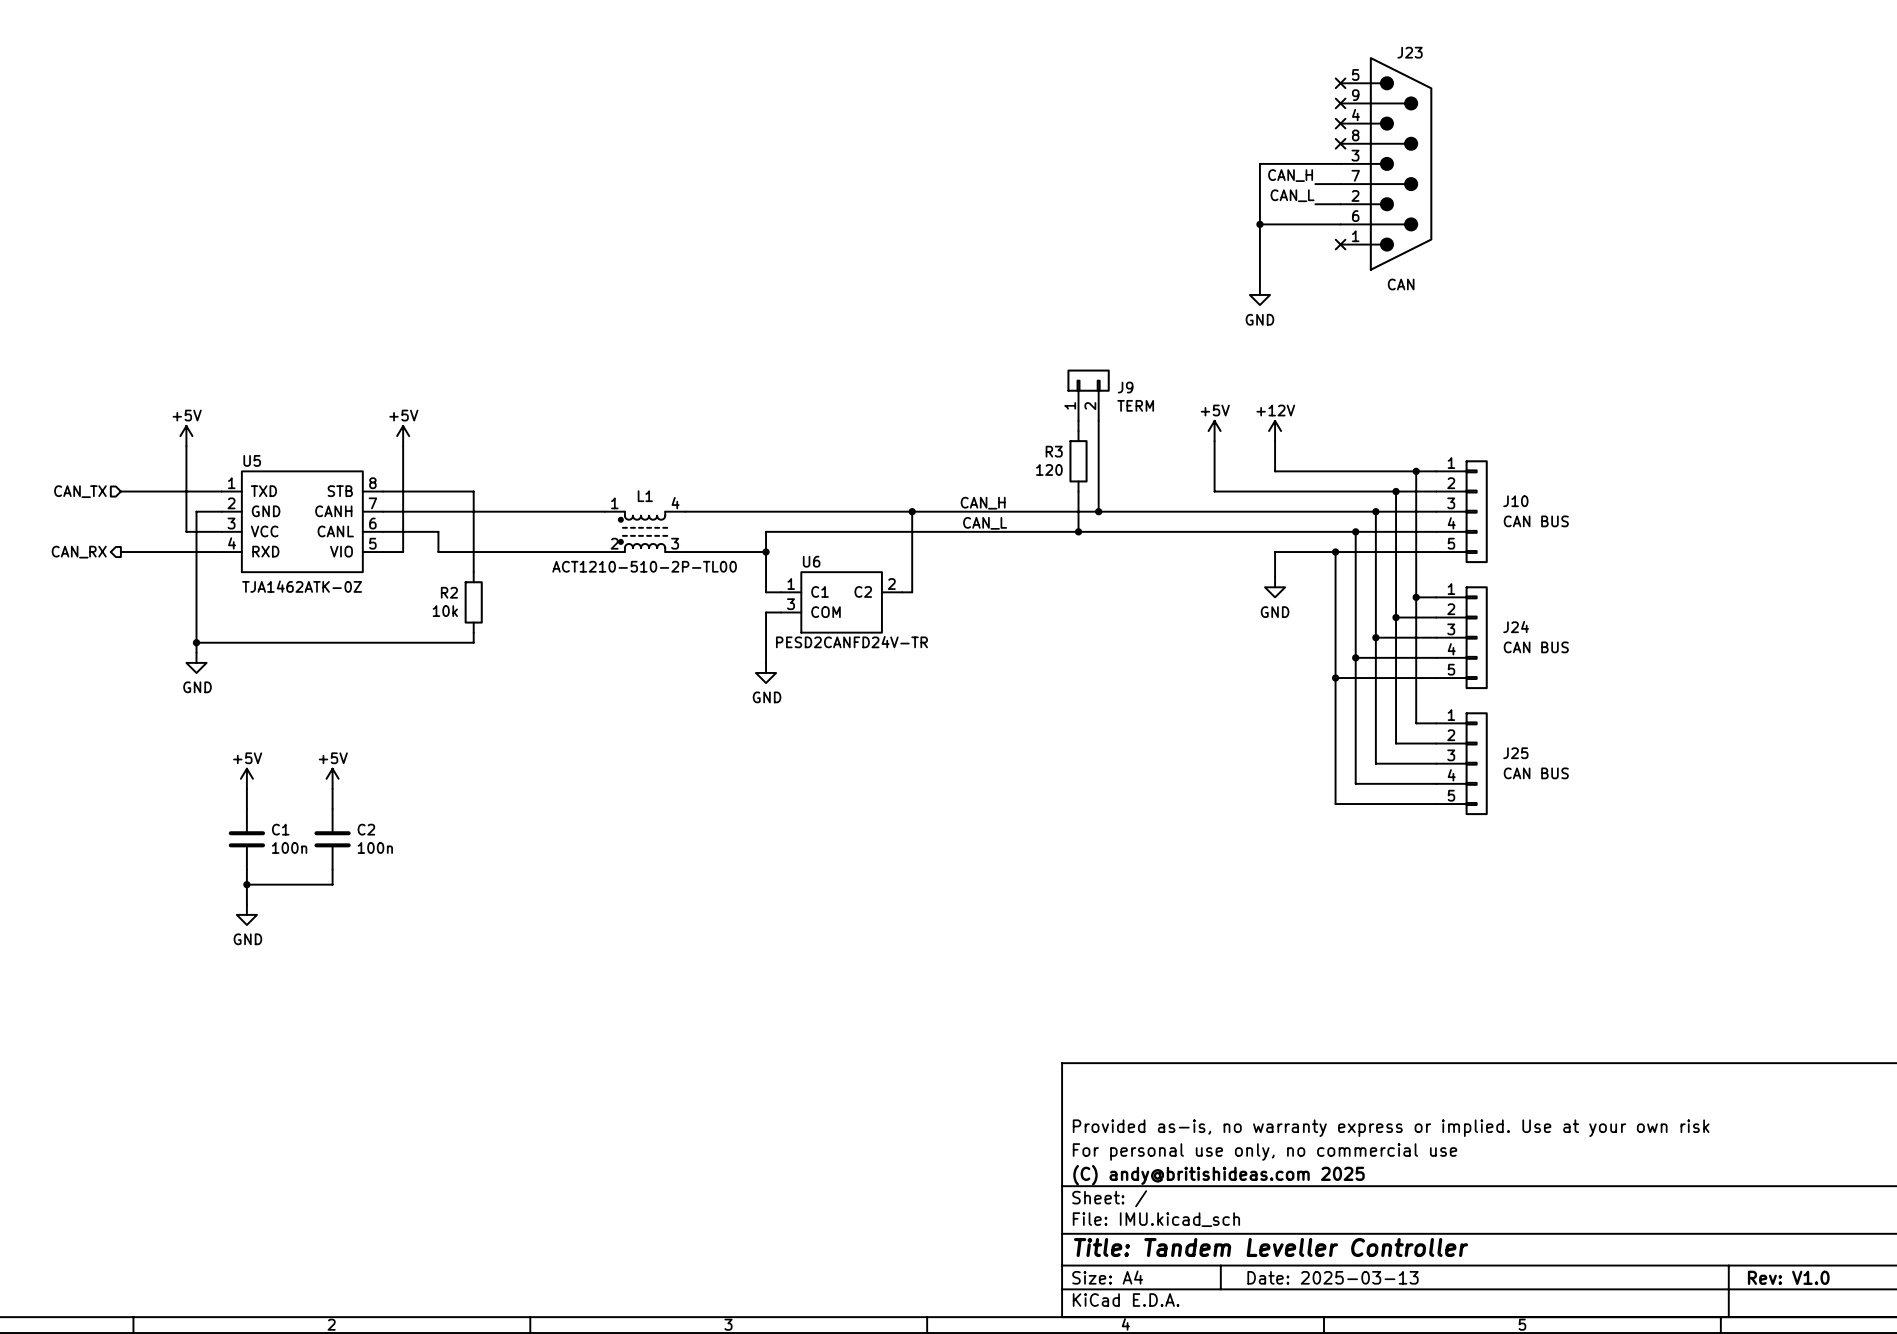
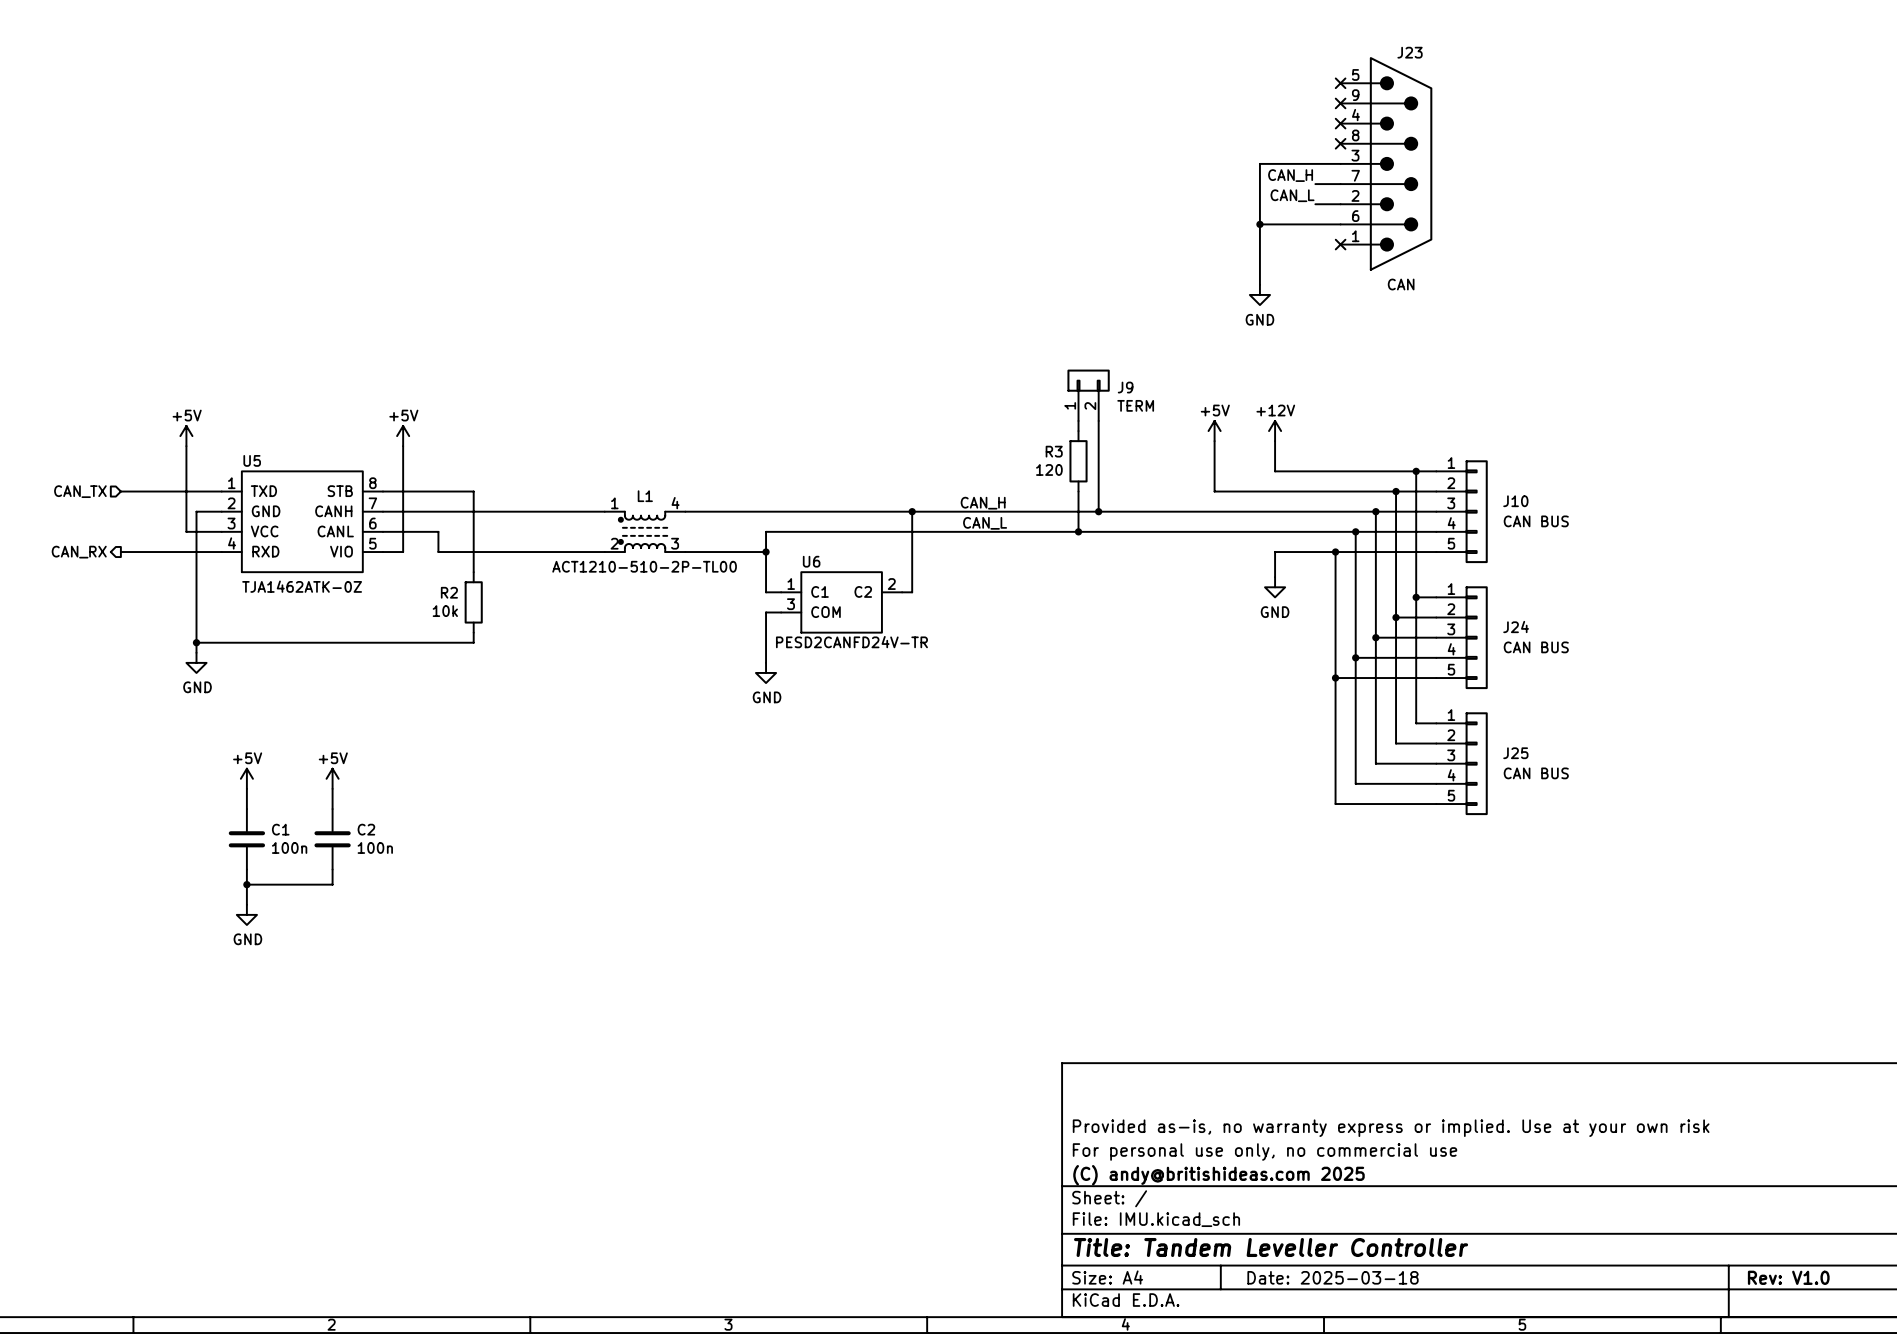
title block: Date: 2025-03-13 (1333, 1277) -> Date: 2025-03-18 (1333, 1277)

